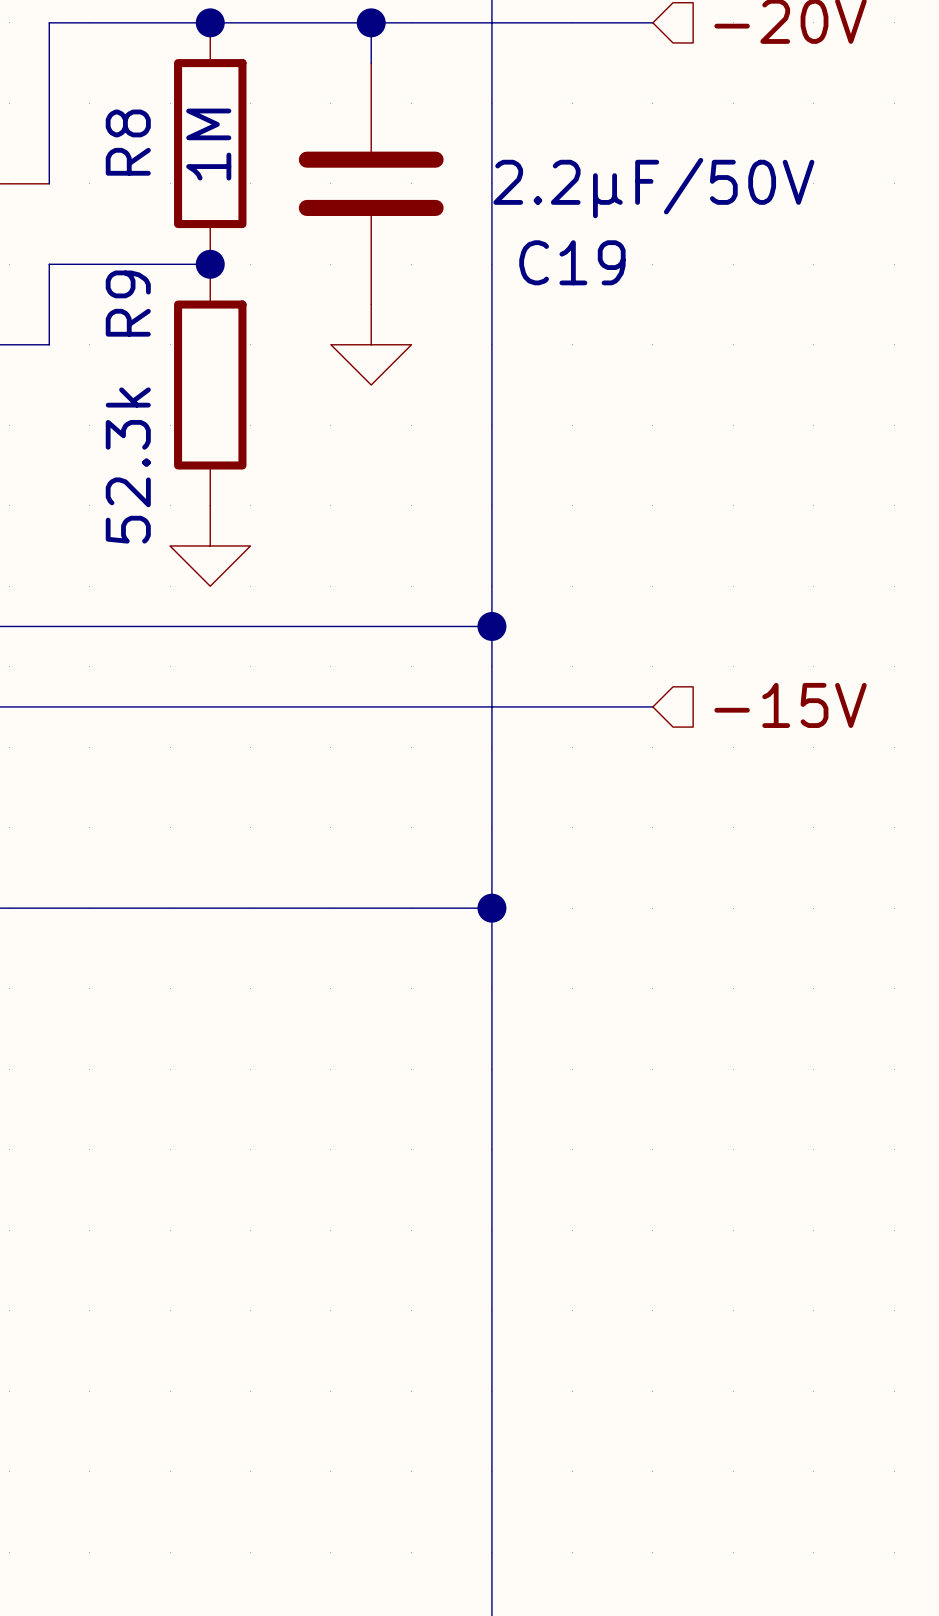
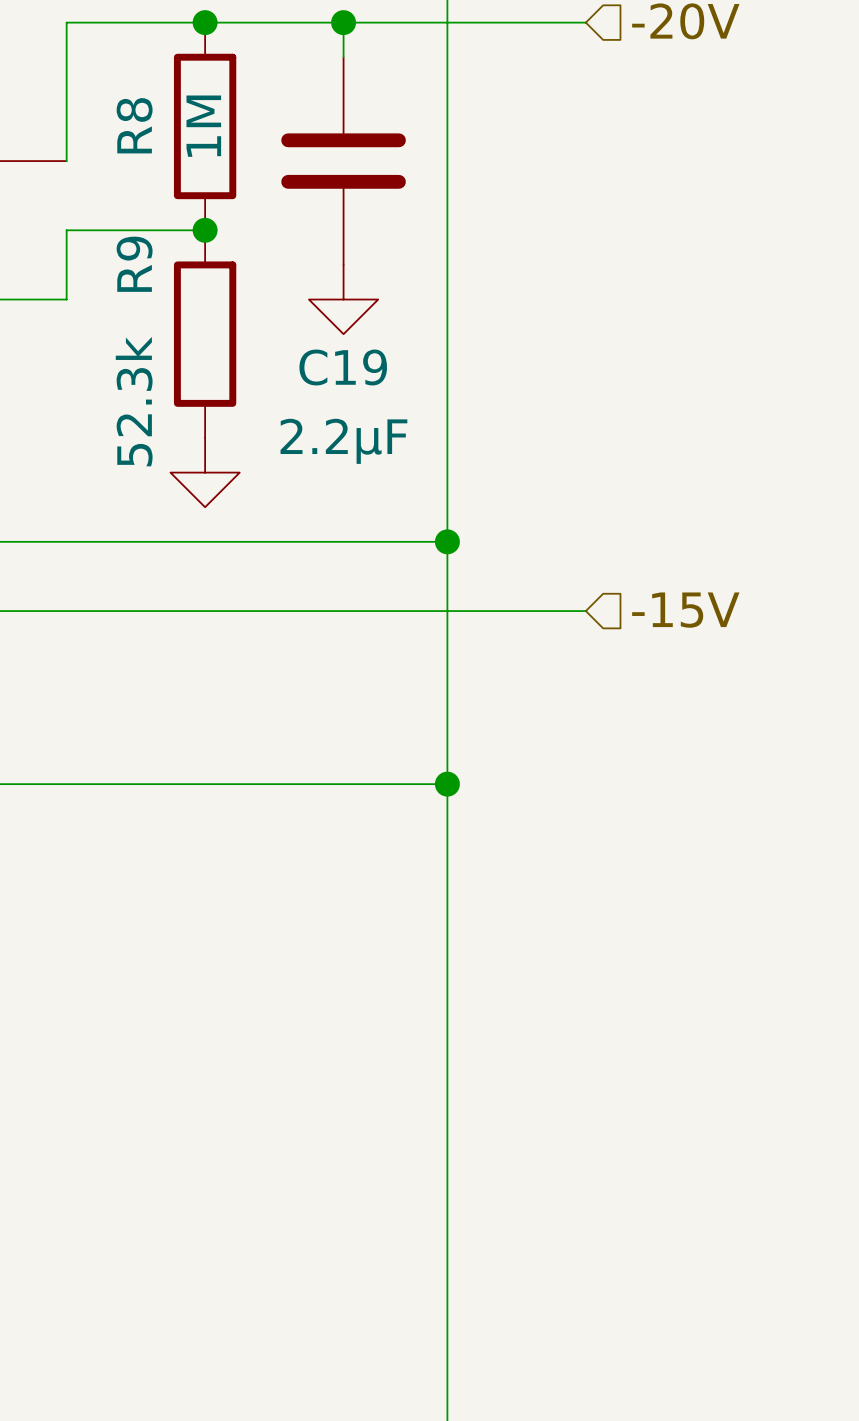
C19 value: 2.2µF/50V (653, 188) -> 2.2µF (343, 441)
C19 name position: C19 (572, 262) -> C19 (343, 367)

